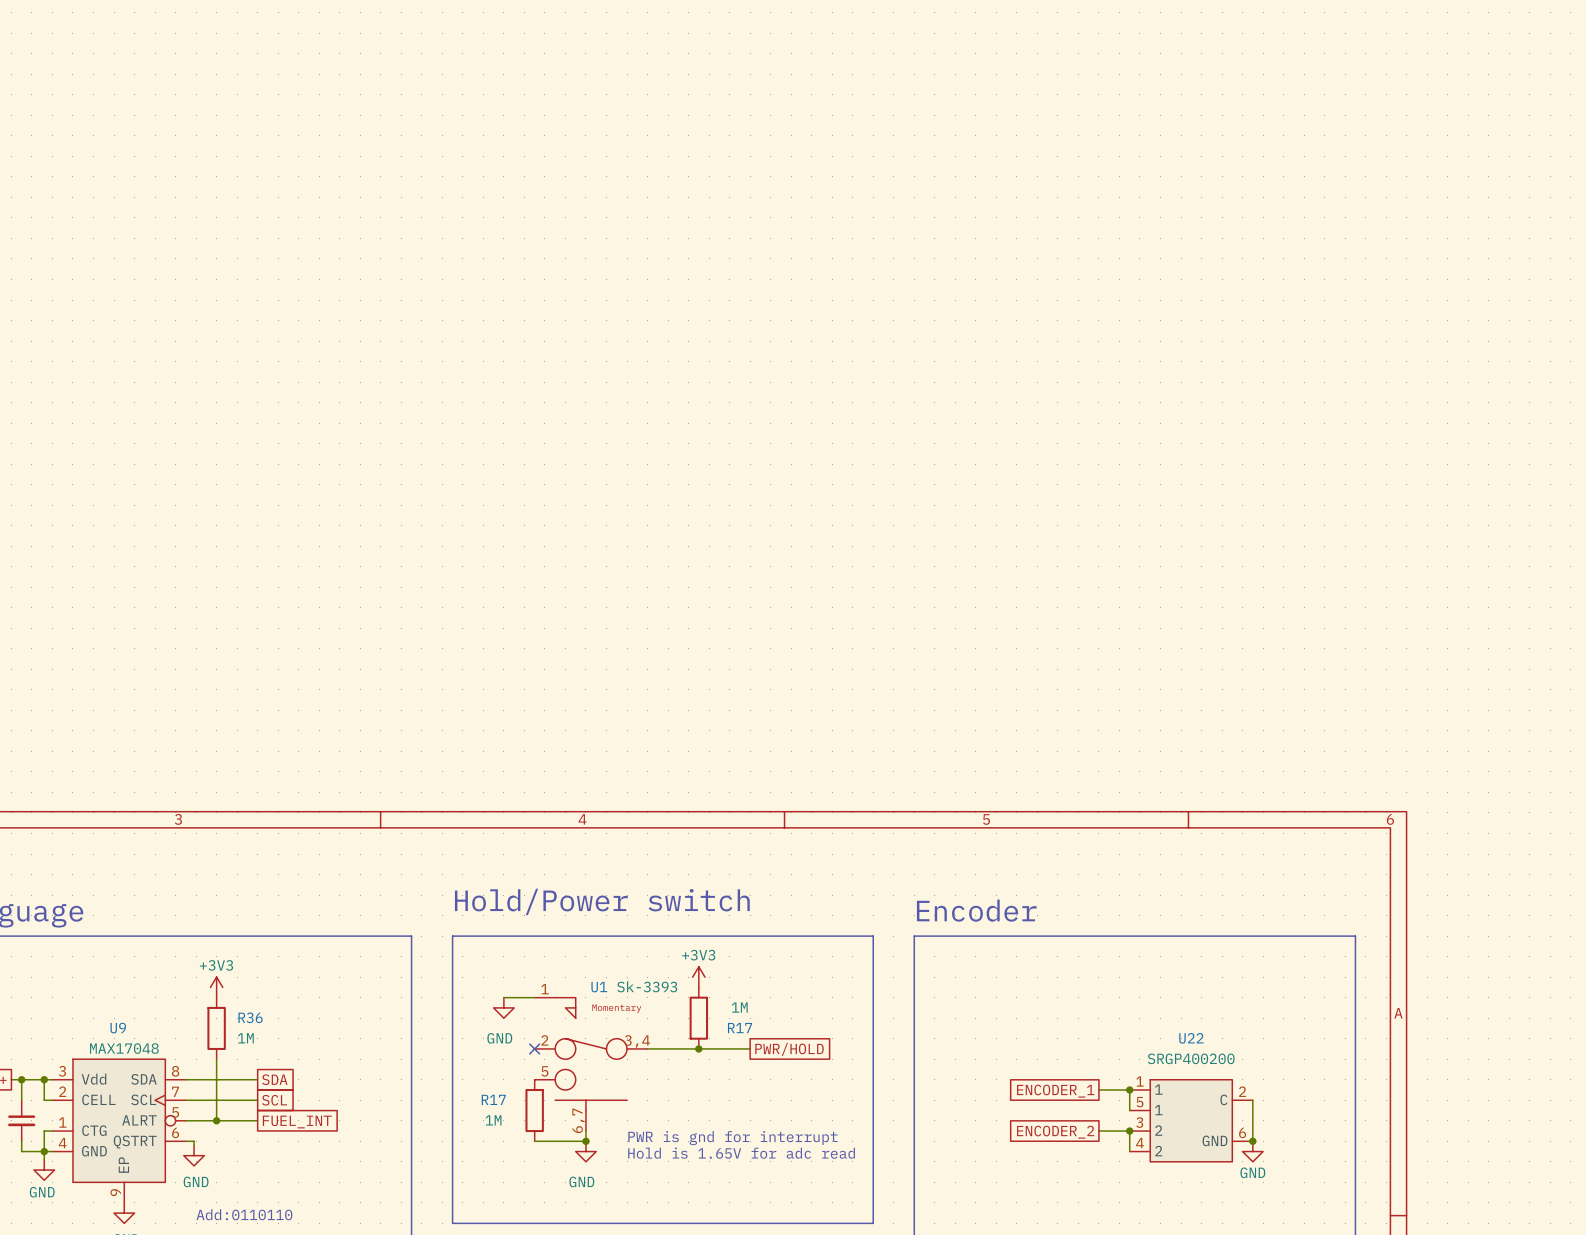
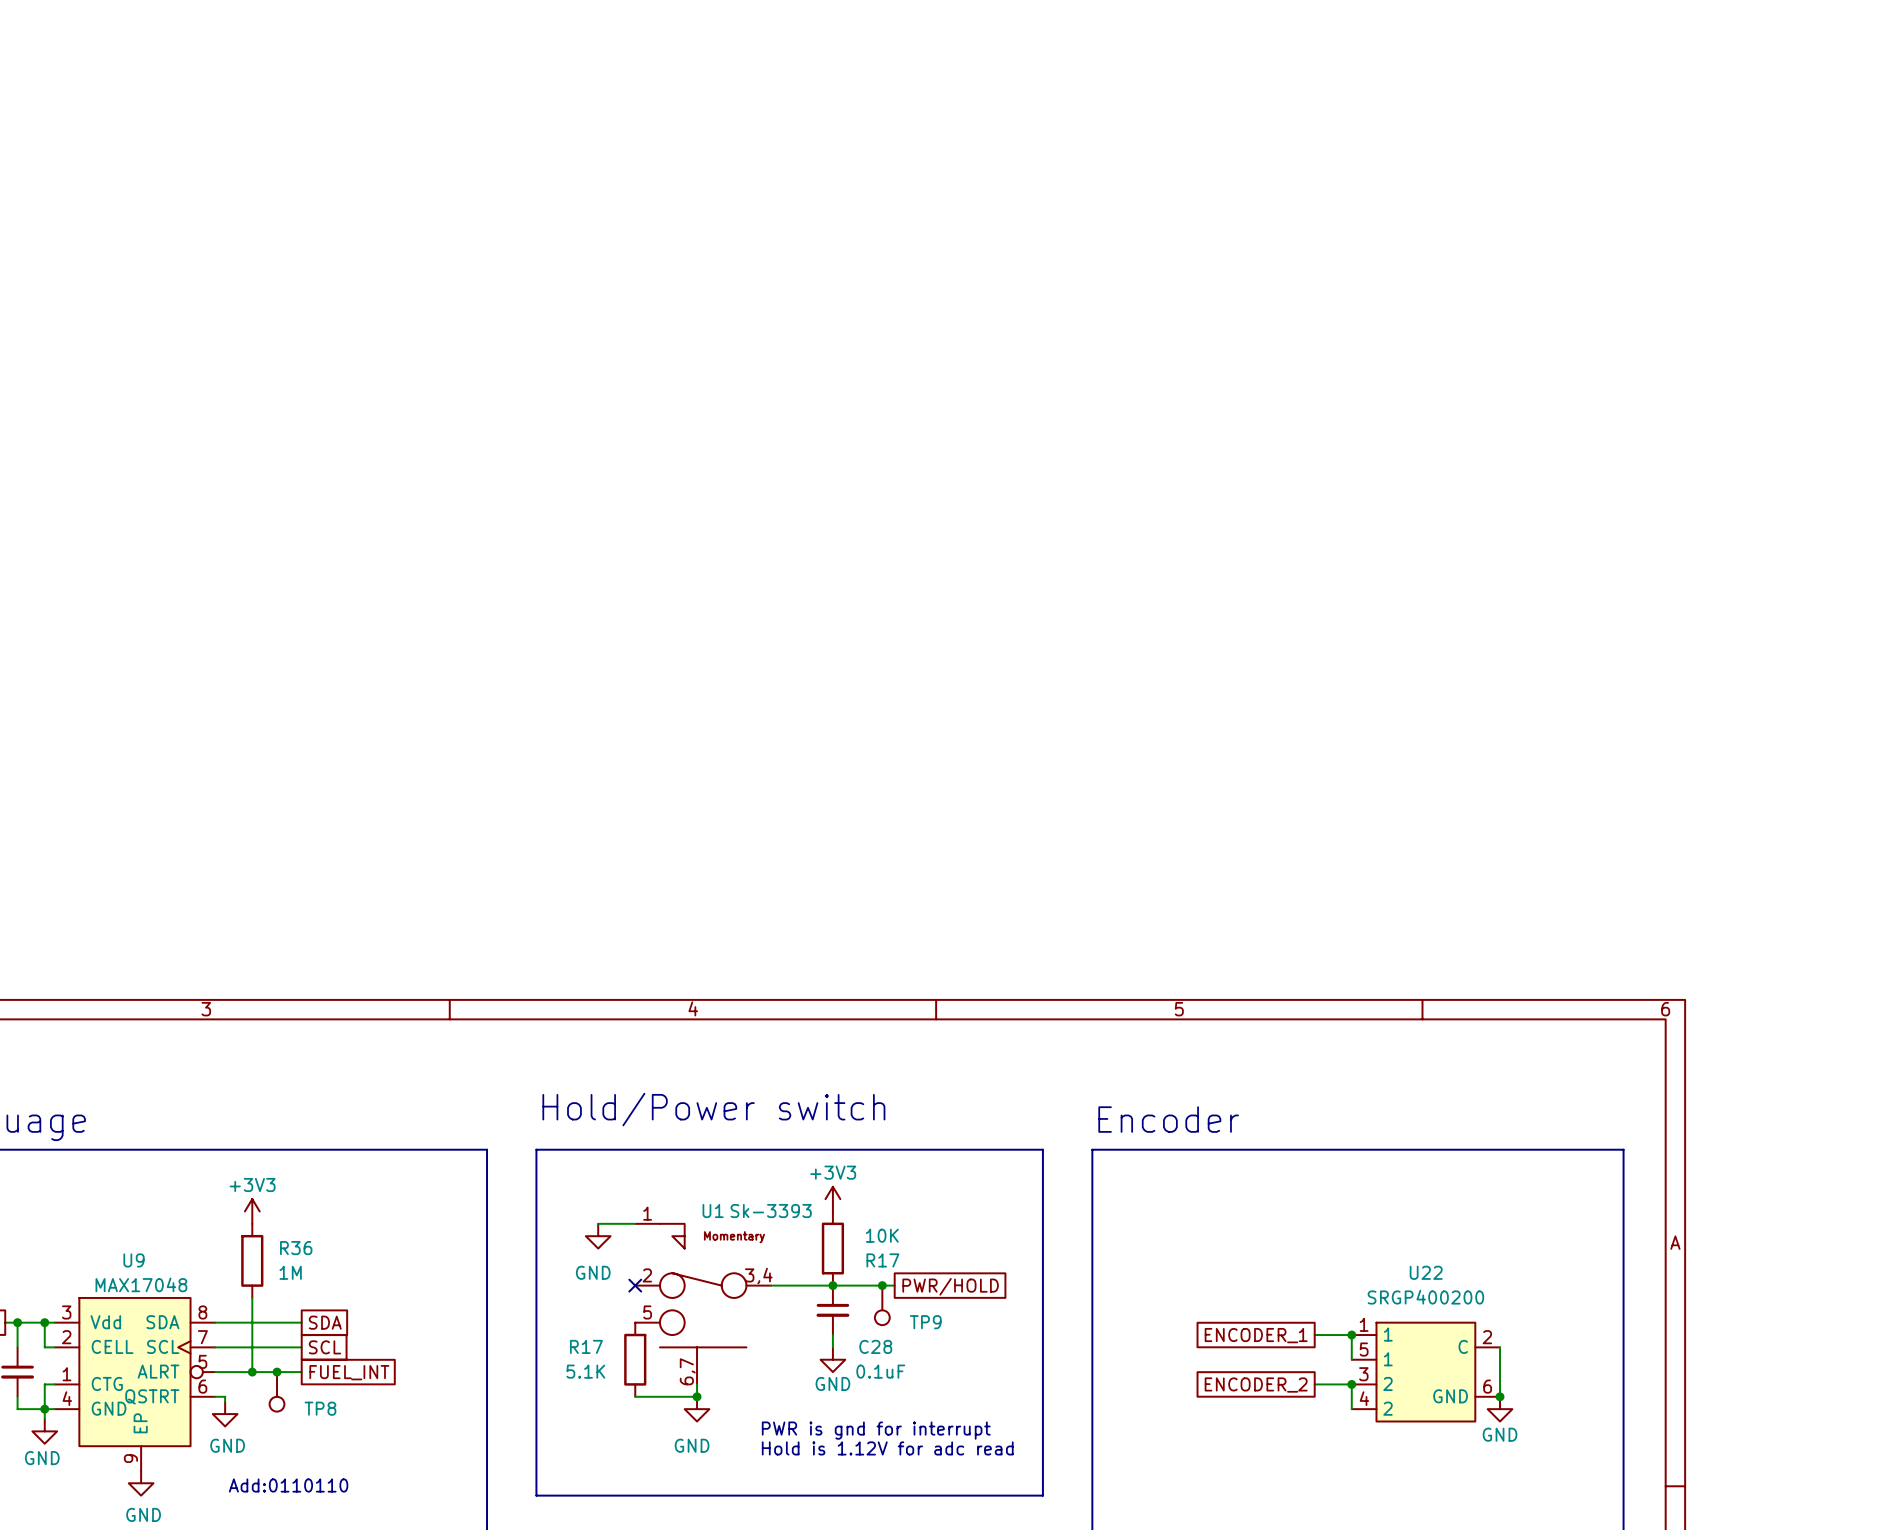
R17 value: 1M (739, 1007) -> 10K (882, 1235)
junction: none -> (882, 1285)
TP9: none -> (882, 1305)
C28: none -> 0.1uF (832, 1310)
wire: none -> (832, 1335) (832, 1347)
power symbol: none -> GND (832, 1359)
junction: none -> (277, 1372)
R17 value: 1M (493, 1120) -> 5.1K (585, 1371)
TP8: none -> (277, 1391)
text position: PWR is gnd for interrupt (732, 1138) -> PWR is gnd for interrupt (876, 1430)
text: Hold is 1.65V for adc read (741, 1153) -> none
text: none -> Hold is 1.12V for adc read (887, 1448)

